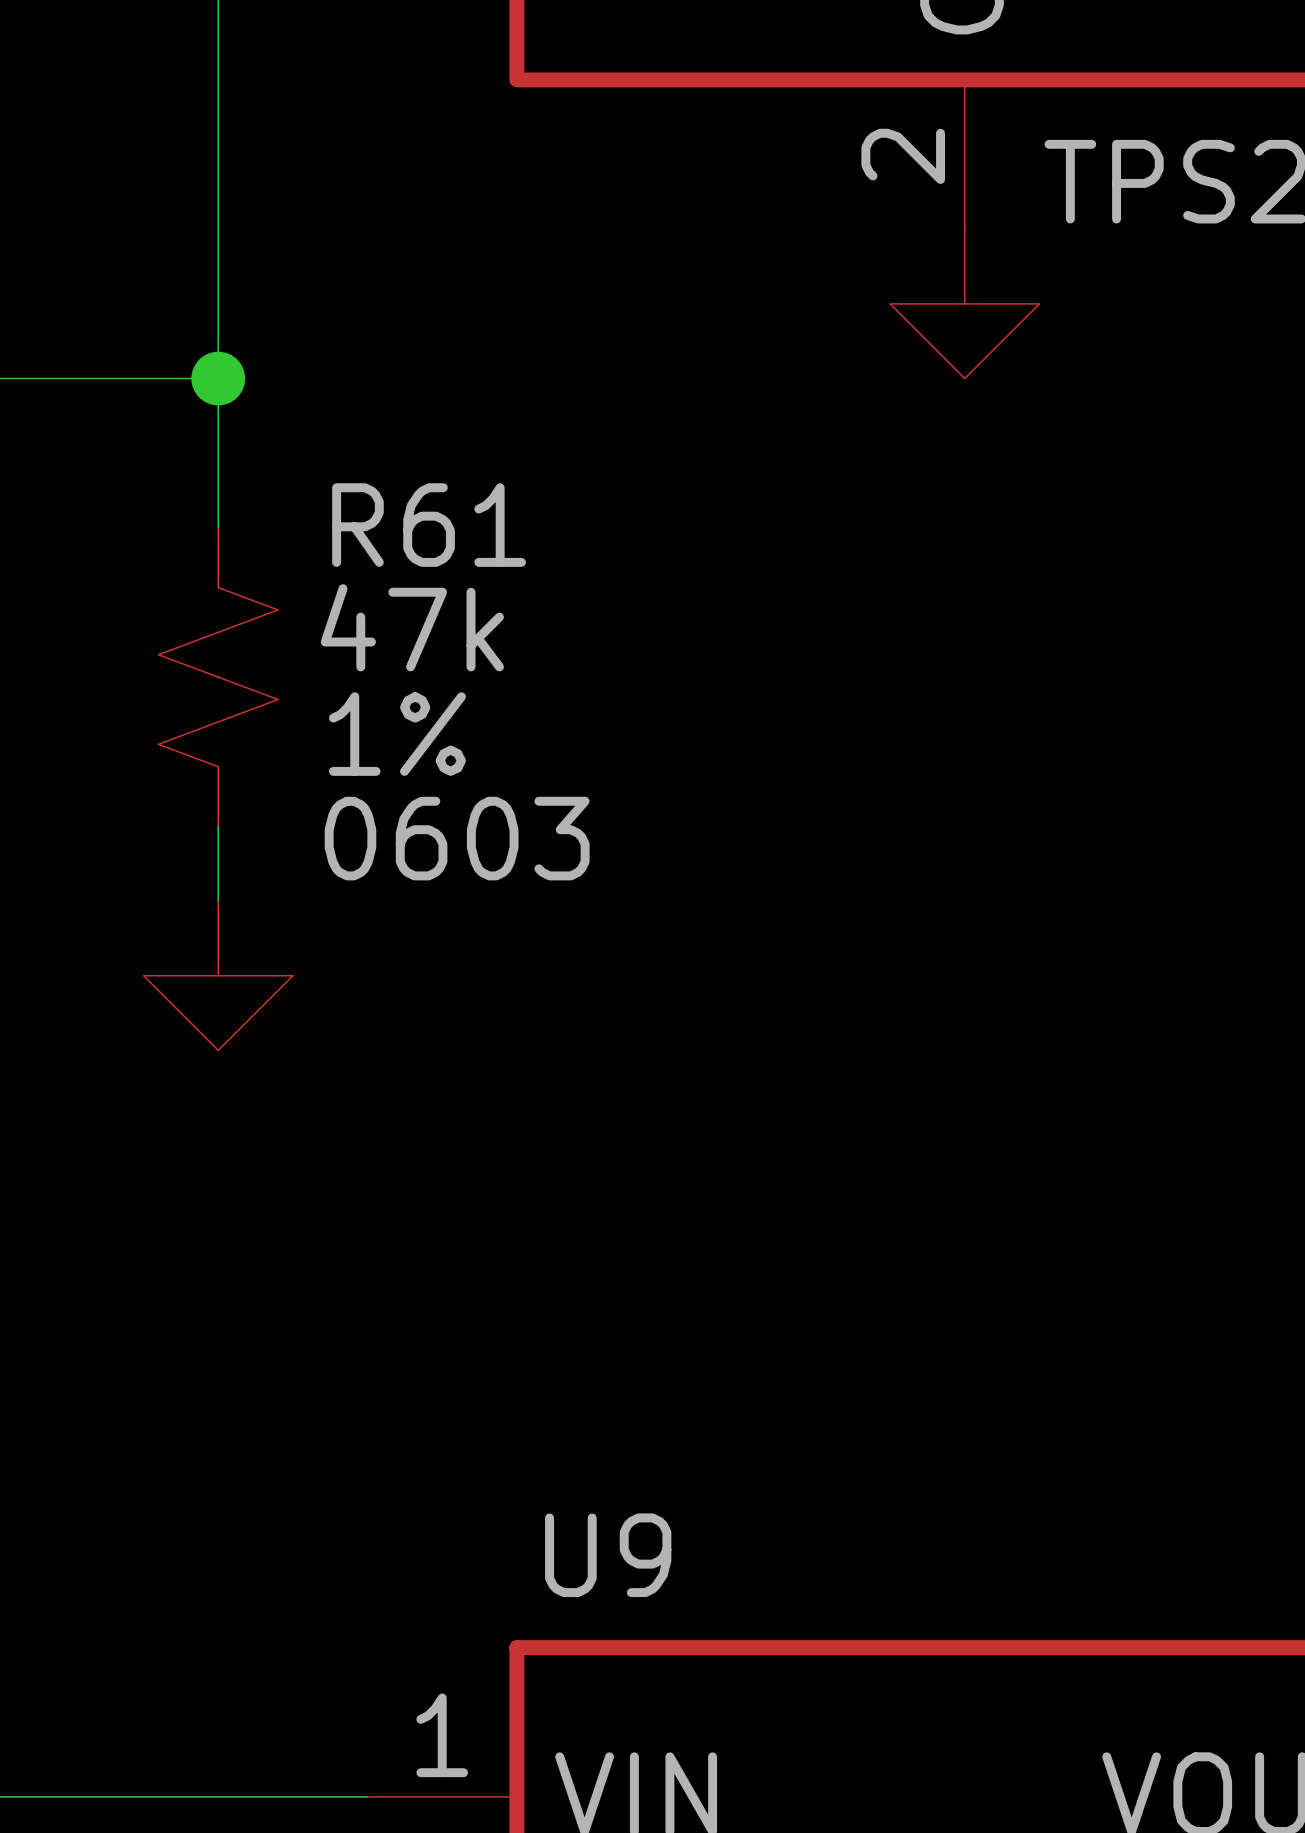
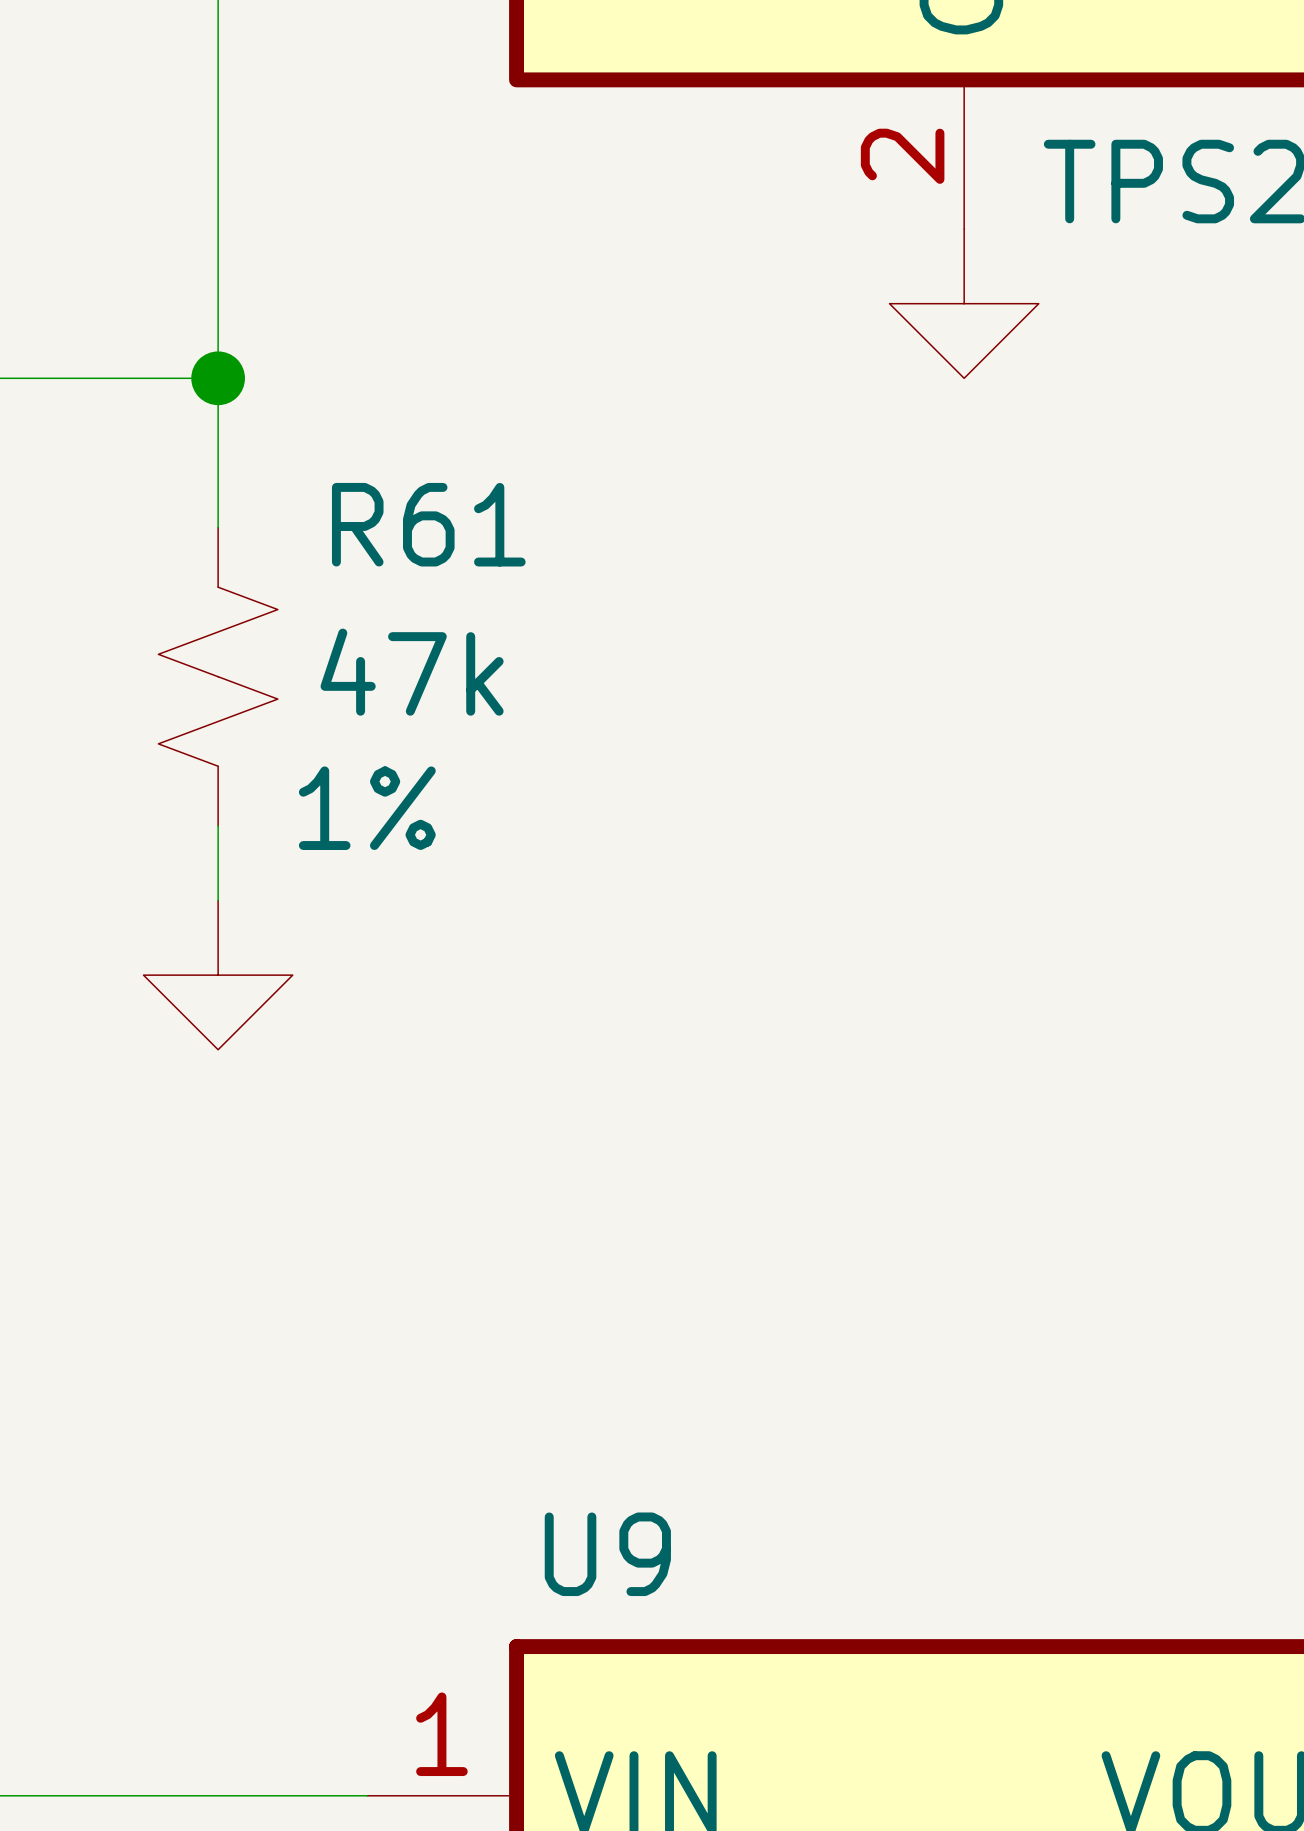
R61 value position: 47k (412, 627) -> 47k (412, 672)
R61 text position: 1% (397, 734) -> 1% (367, 808)
R61 text: 0603 (457, 838) -> none

